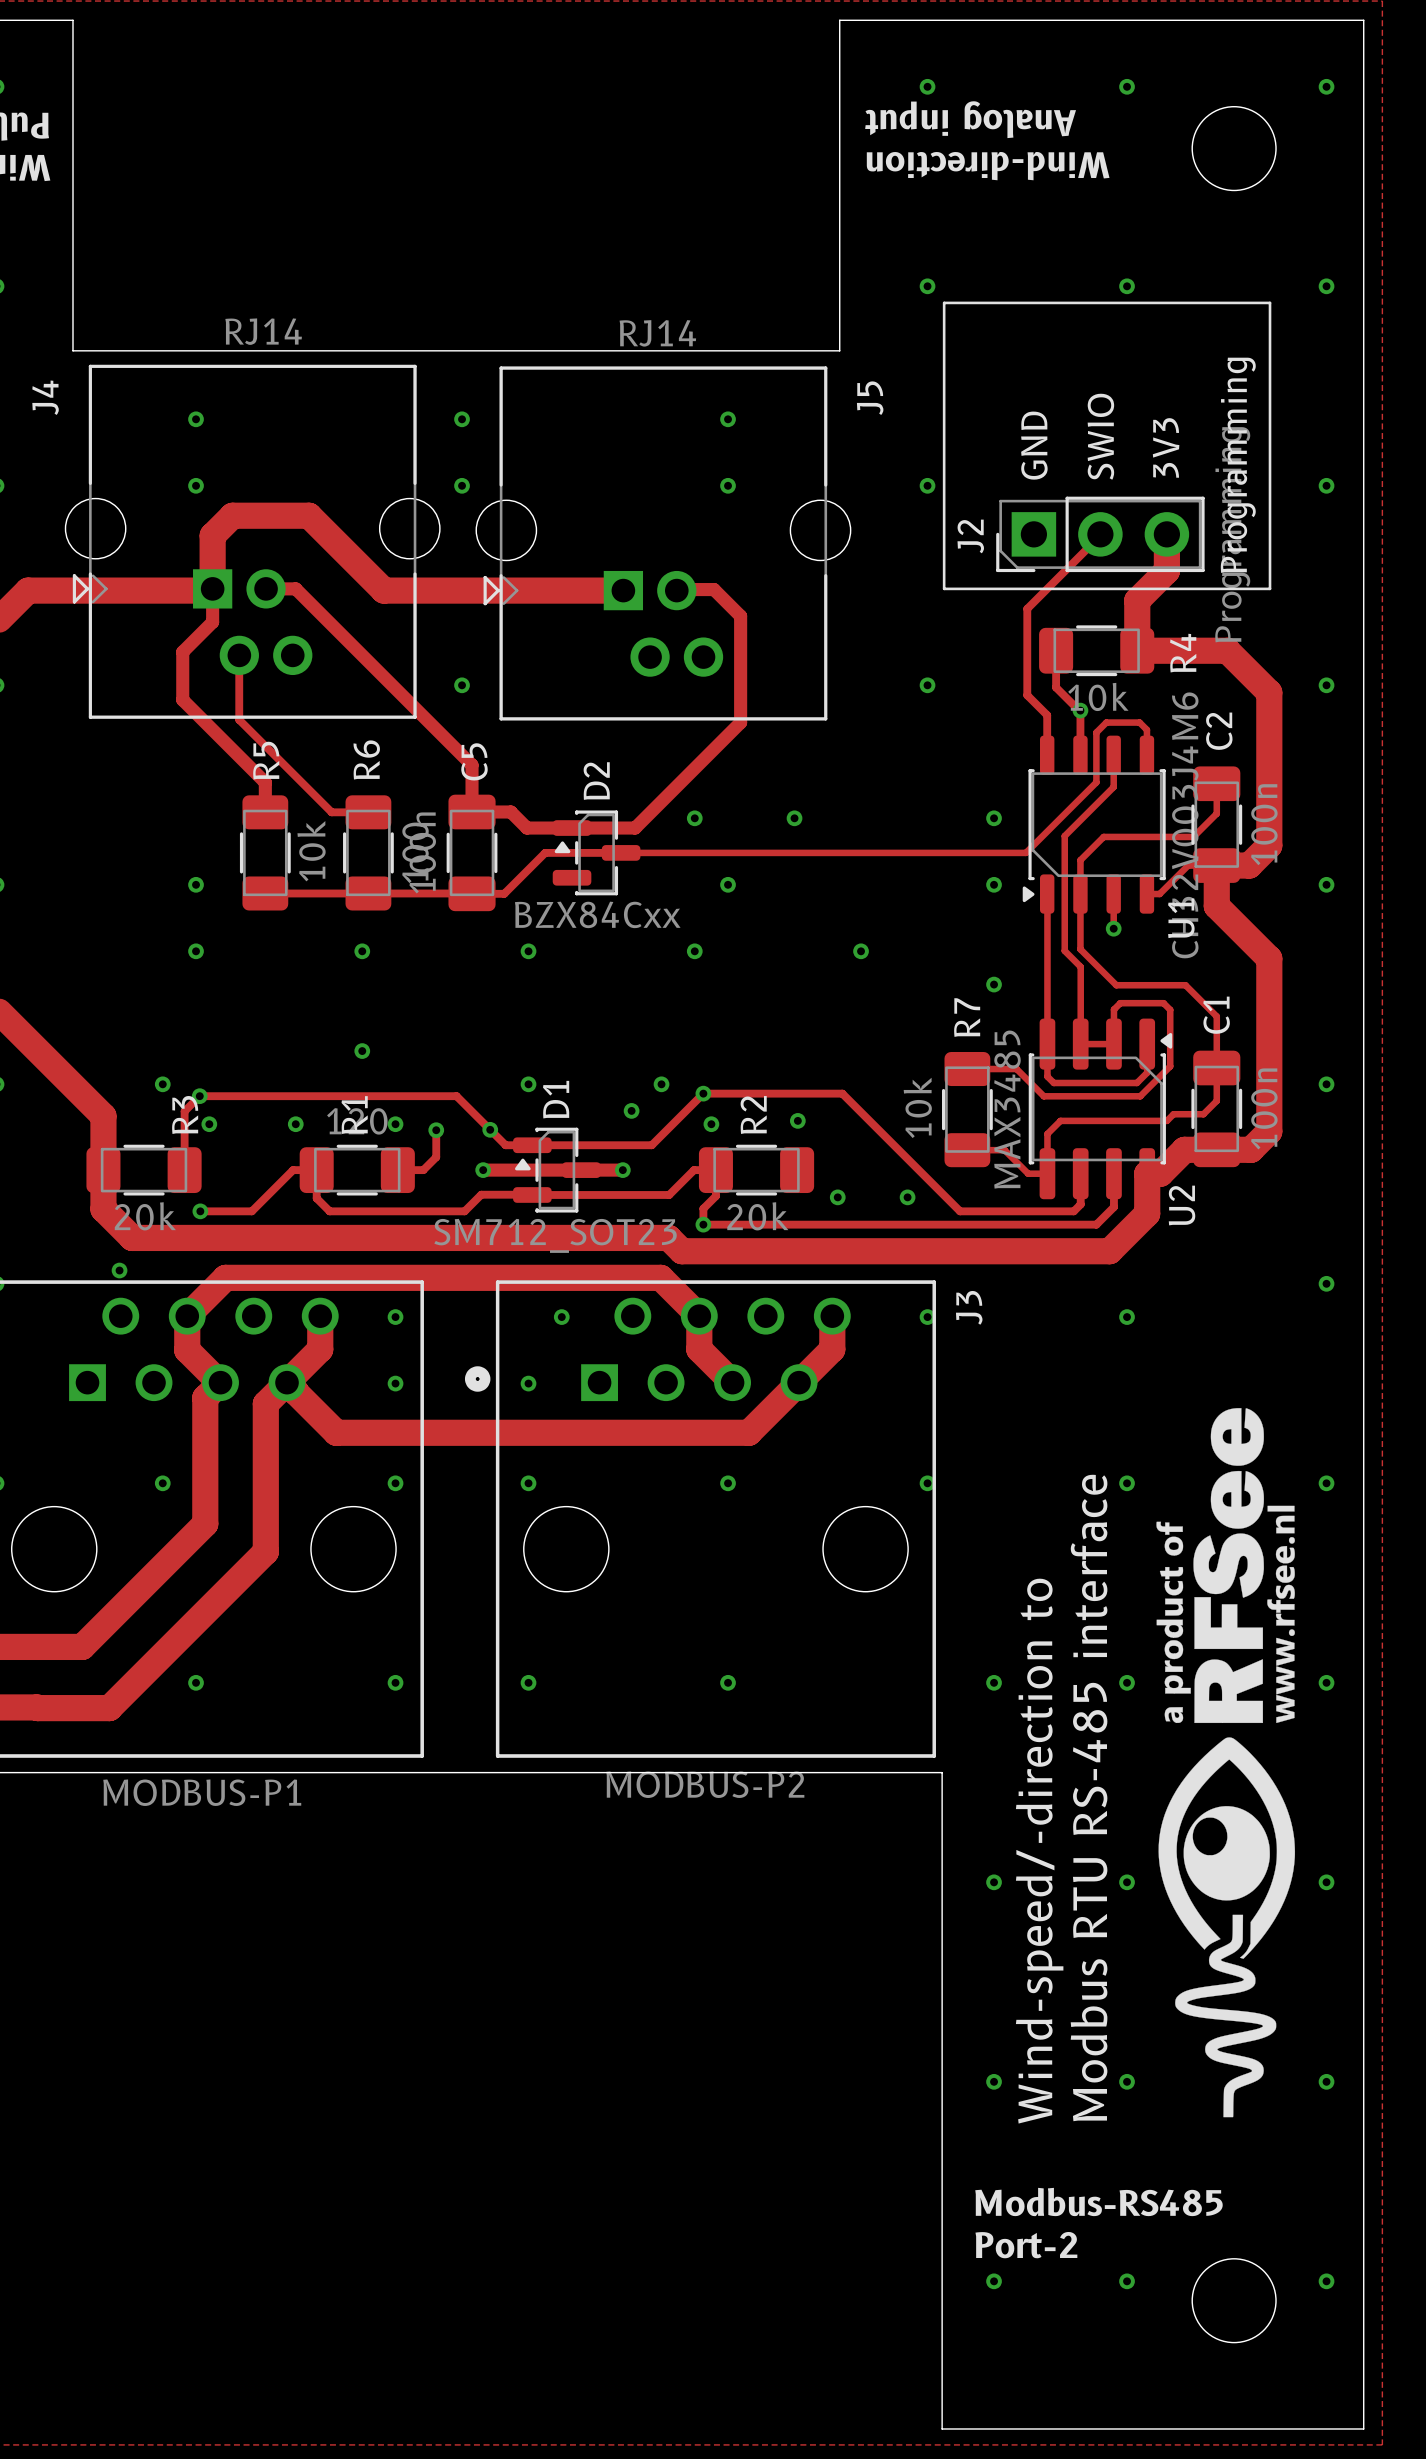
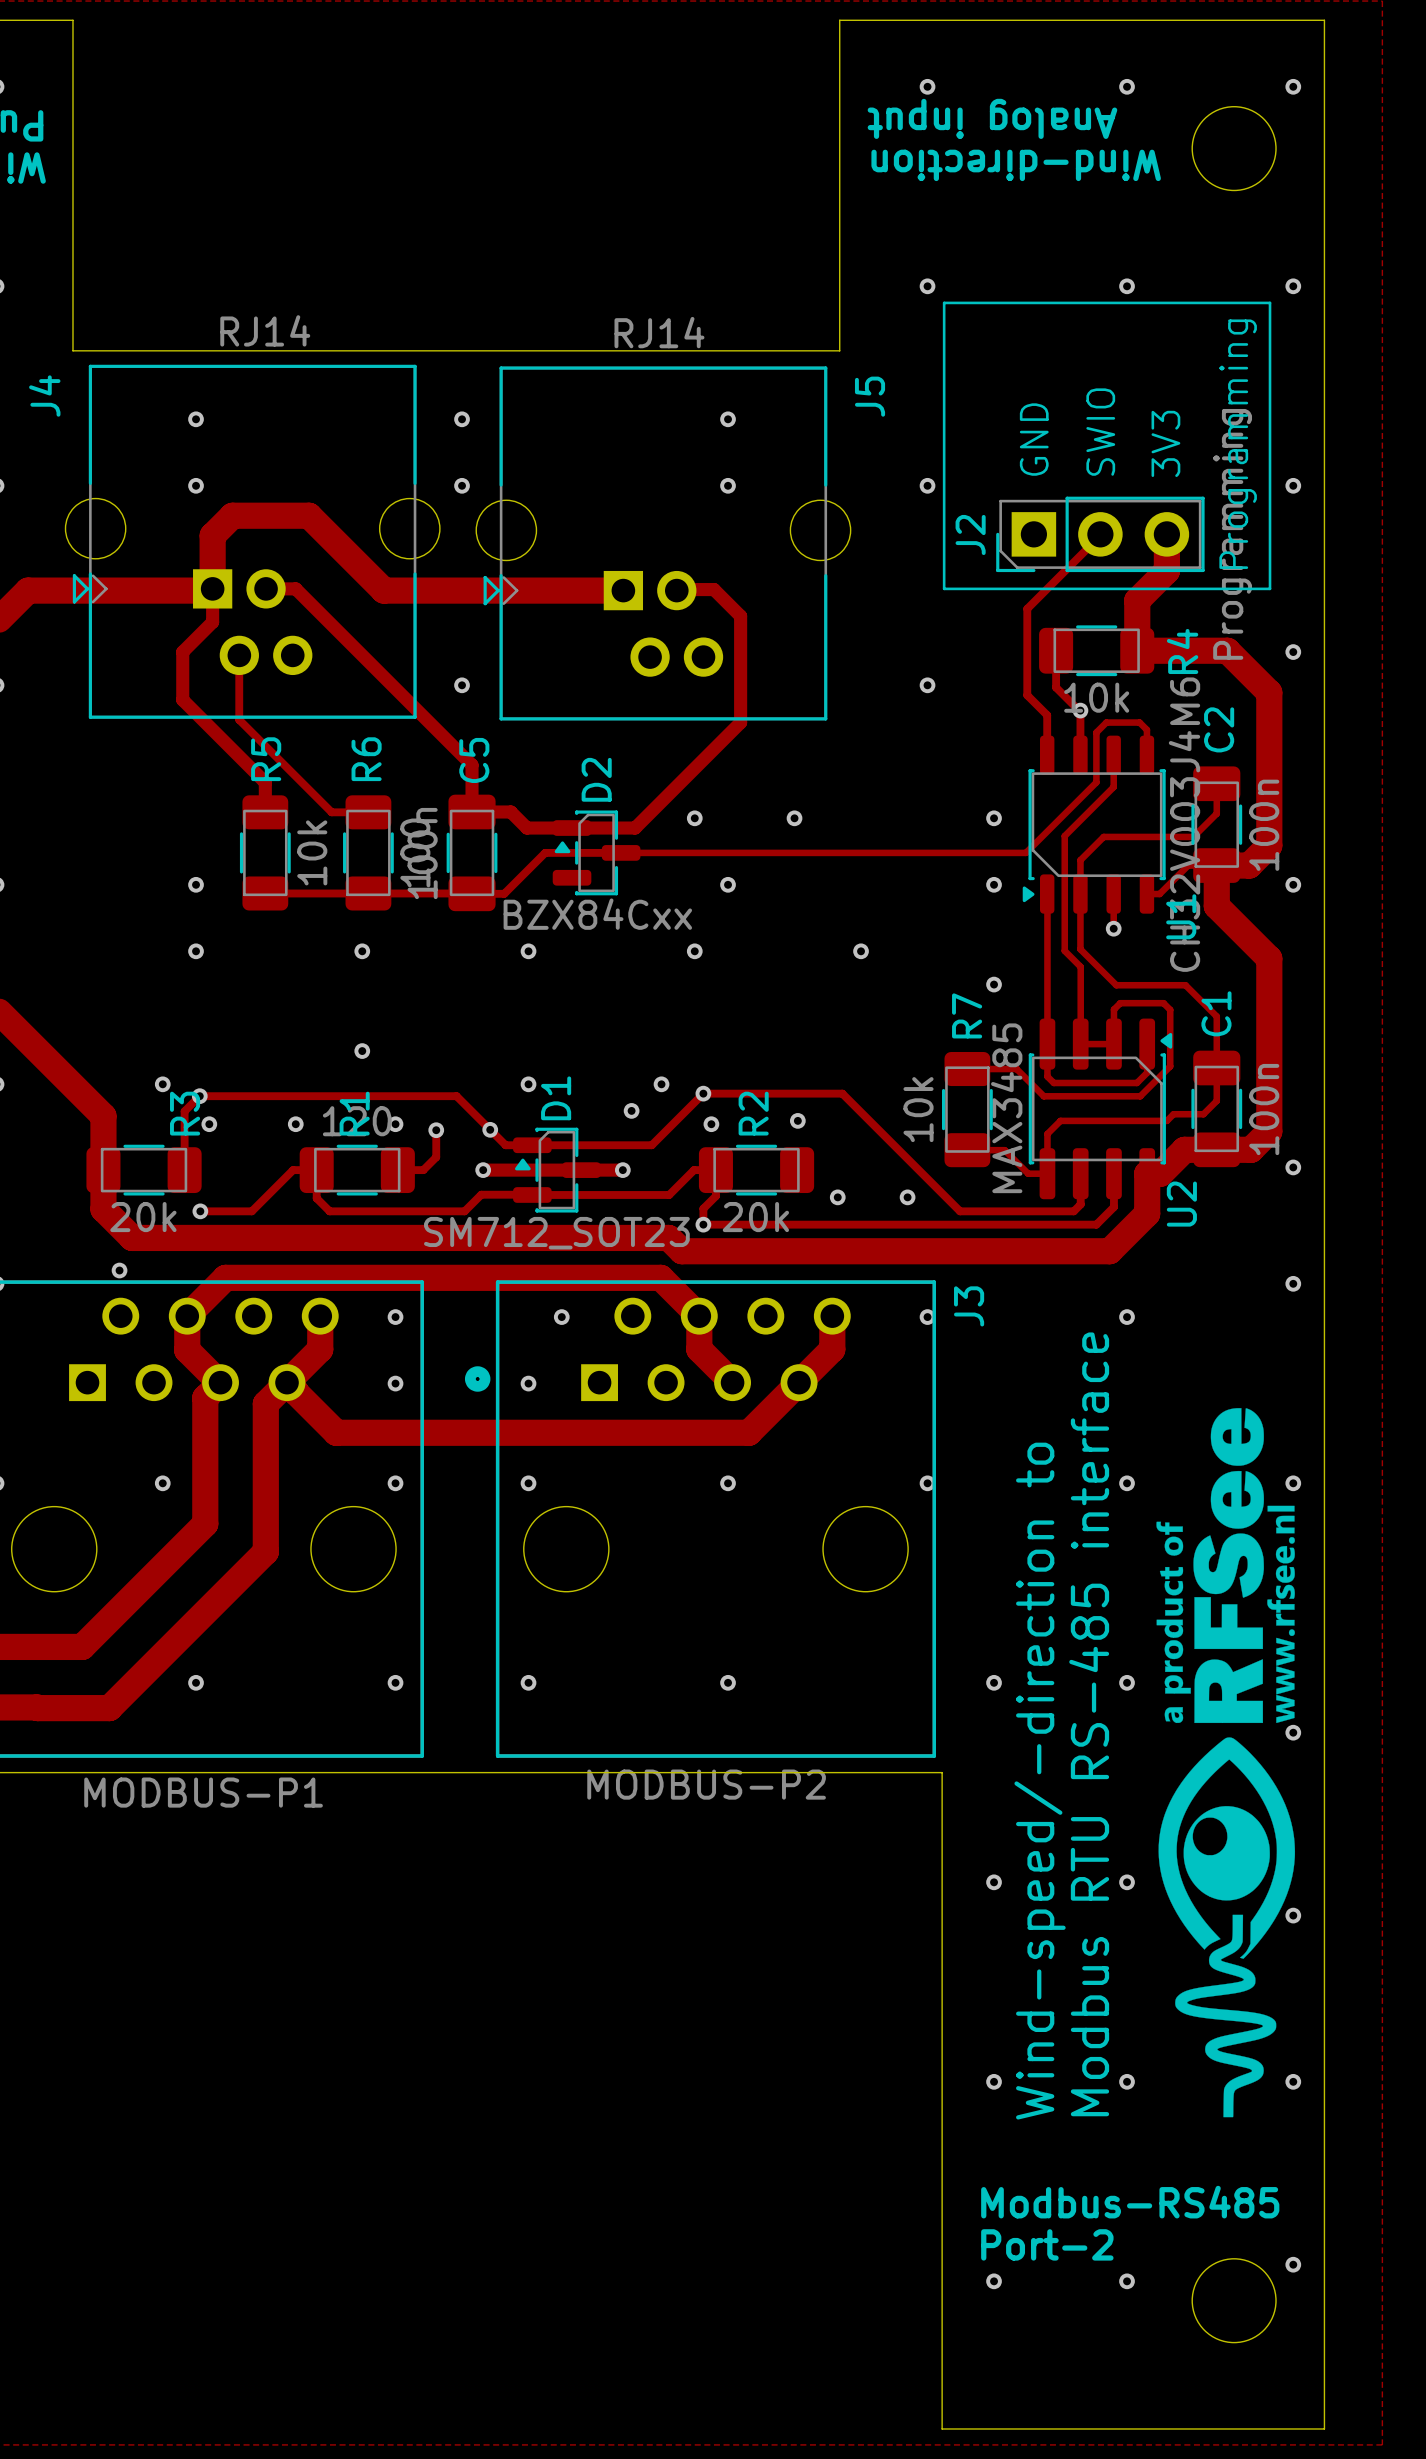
board edge: (1324, 20) (1363, 20) (1363, 2428) (1324, 2428) -> (1324, 20) (1324, 2428)
via position: (1326, 86) -> (1293, 86)
via position: (1326, 286) -> (1293, 286)
via position: (1326, 485) -> (1293, 485)
via position: (1326, 685) -> (1293, 652)
via position: (1326, 884) -> (1293, 884)
via: (1326, 1084) -> none
via: none -> (1293, 1167)
via position: (1326, 1283) -> (1293, 1283)
via position: (1326, 1483) -> (1293, 1483)
via position: (1326, 1682) -> (1293, 1732)
via position: (1326, 1882) -> (1293, 1915)
via position: (1326, 2081) -> (1293, 2081)
via position: (1326, 2281) -> (1293, 2264)

